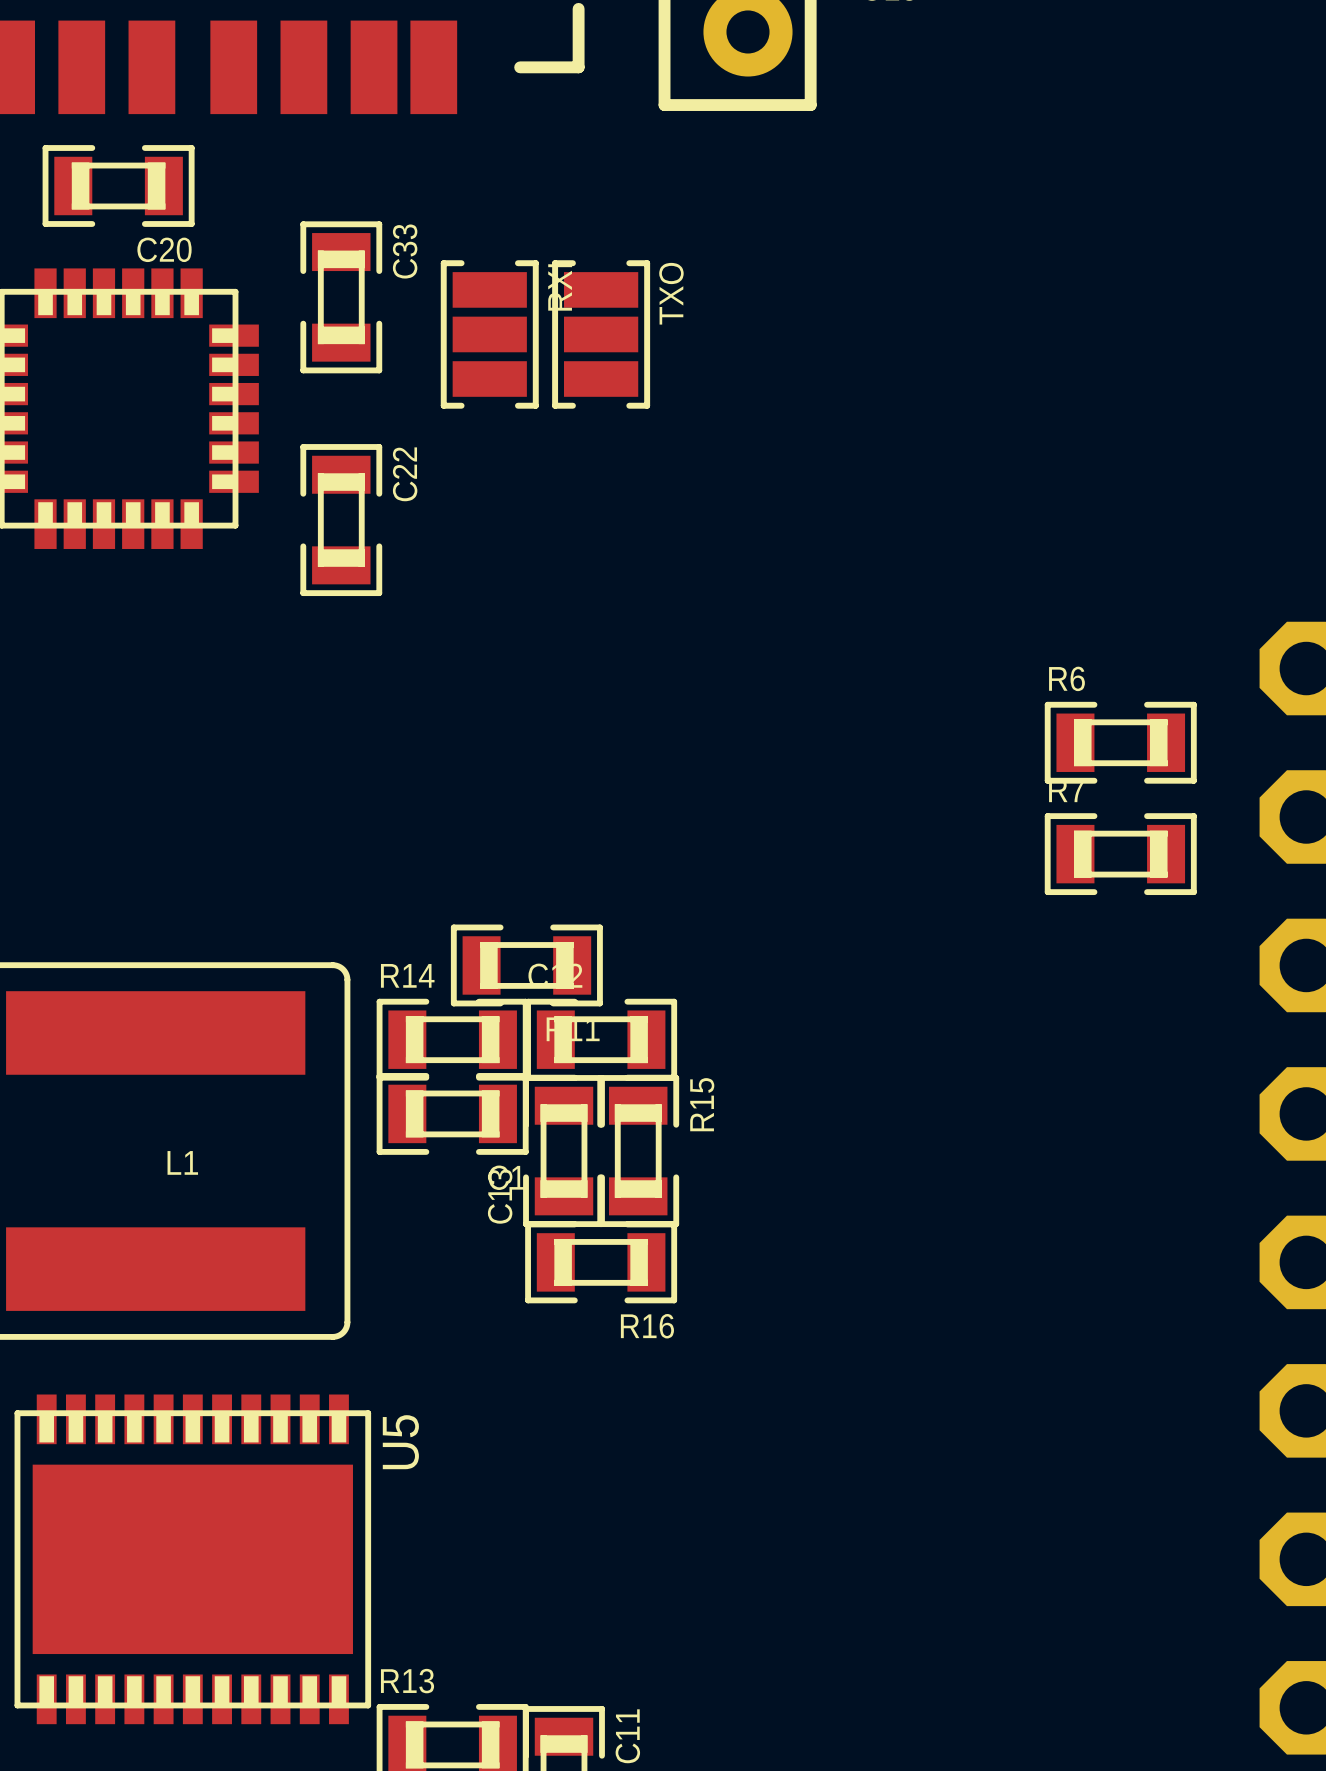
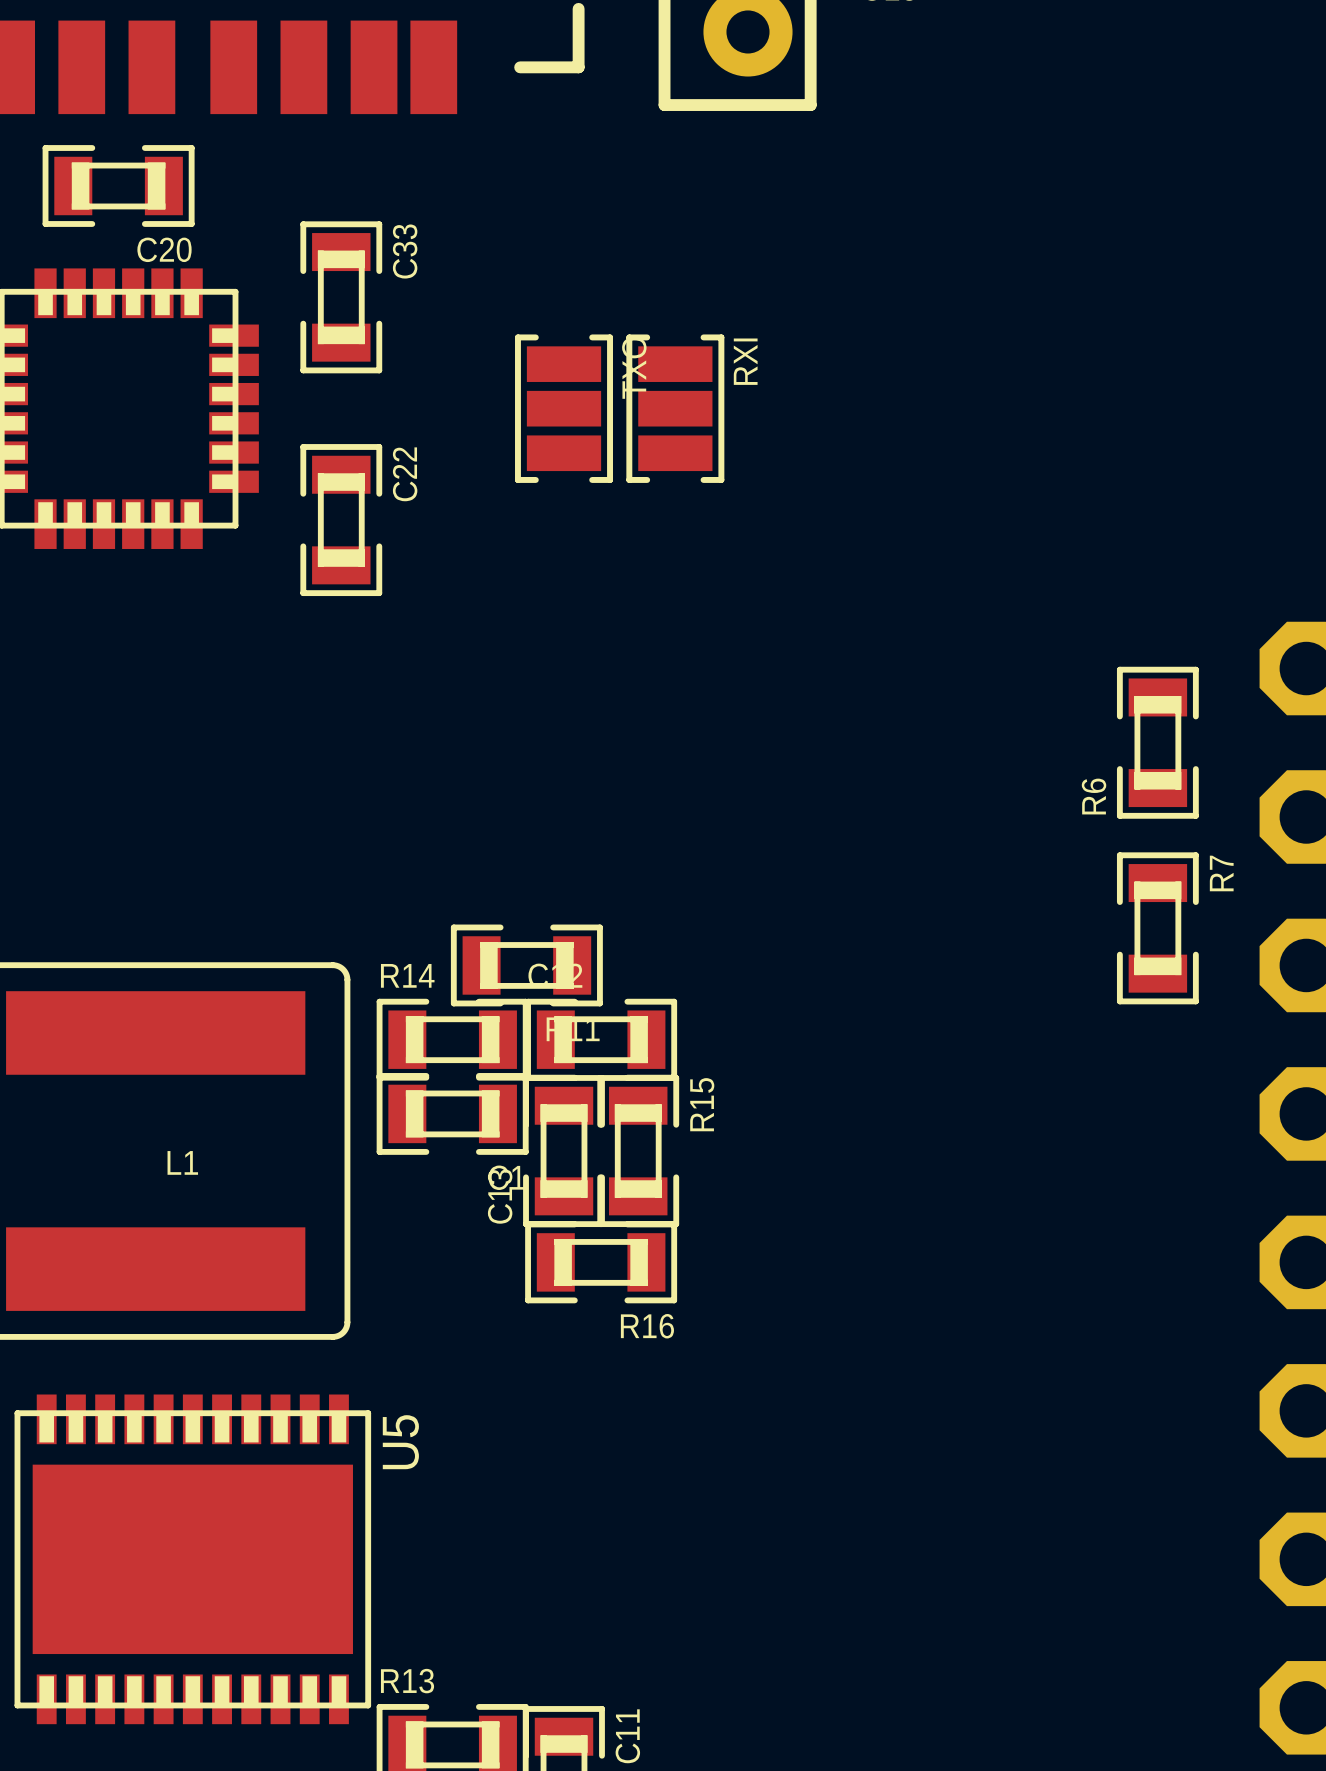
RXI position: (489, 334) -> (675, 408)
TXO position: (601, 334) -> (564, 408)
R6 rotation: 0° (1120, 742) -> 90° clockwise (1157, 742)
R7 rotation: 0° (1120, 854) -> 90° clockwise (1157, 928)

